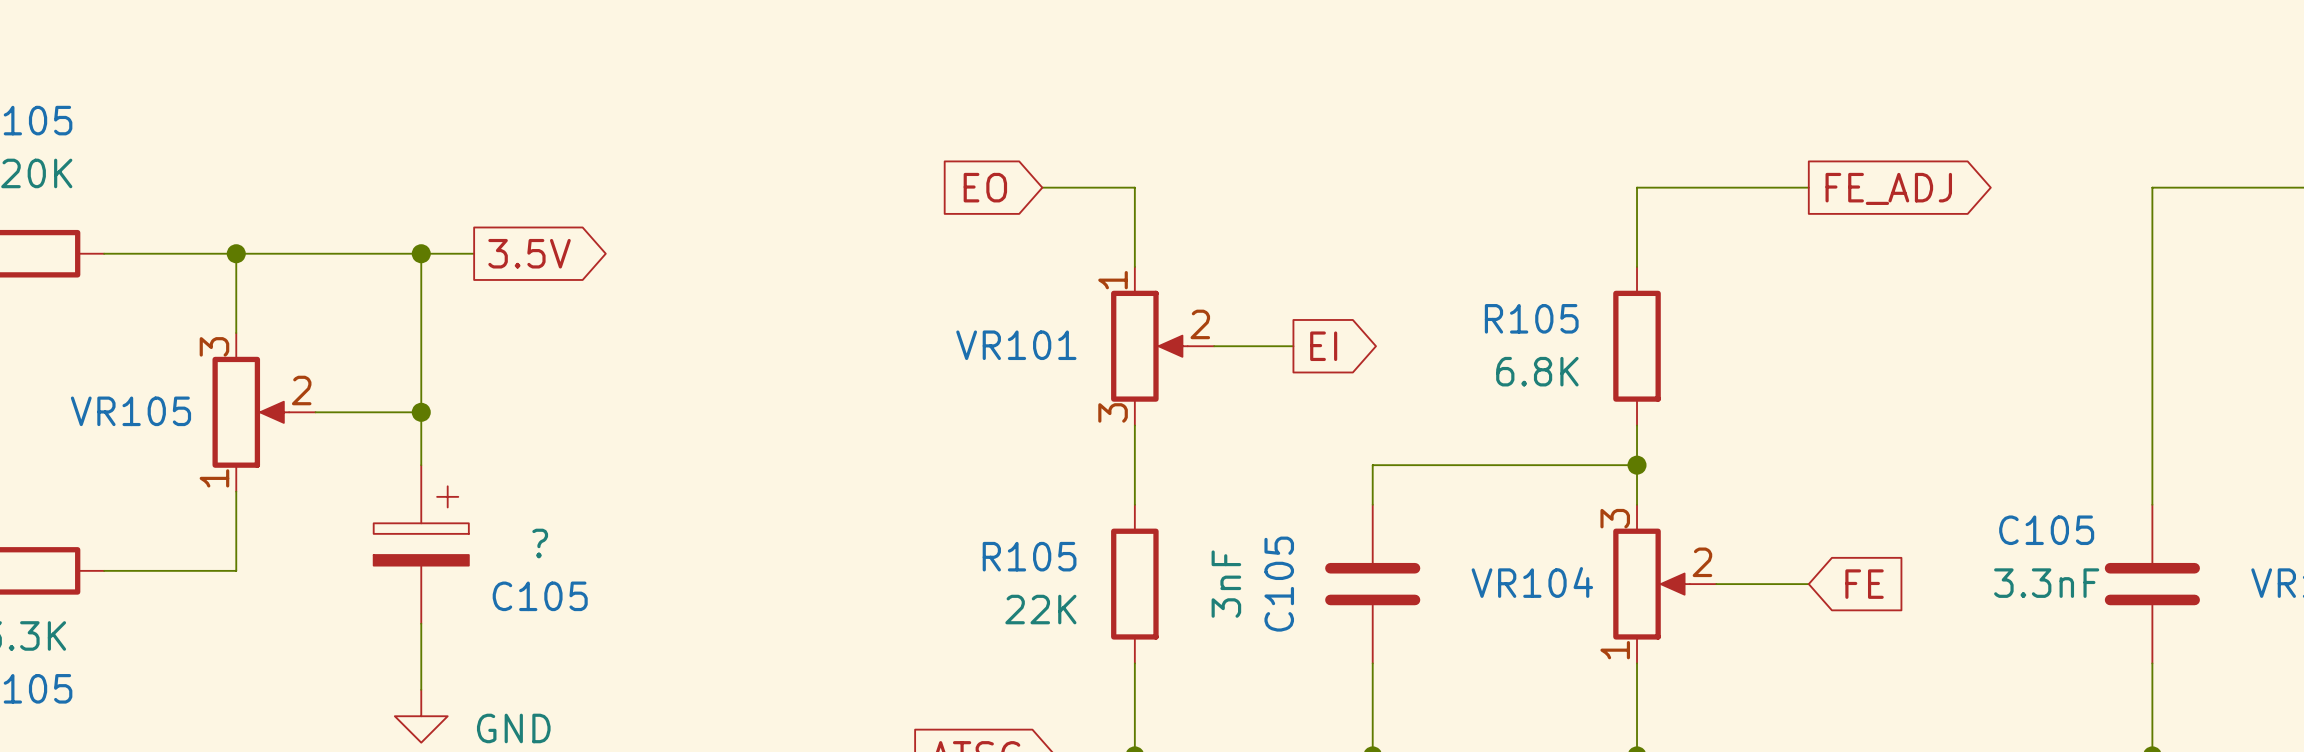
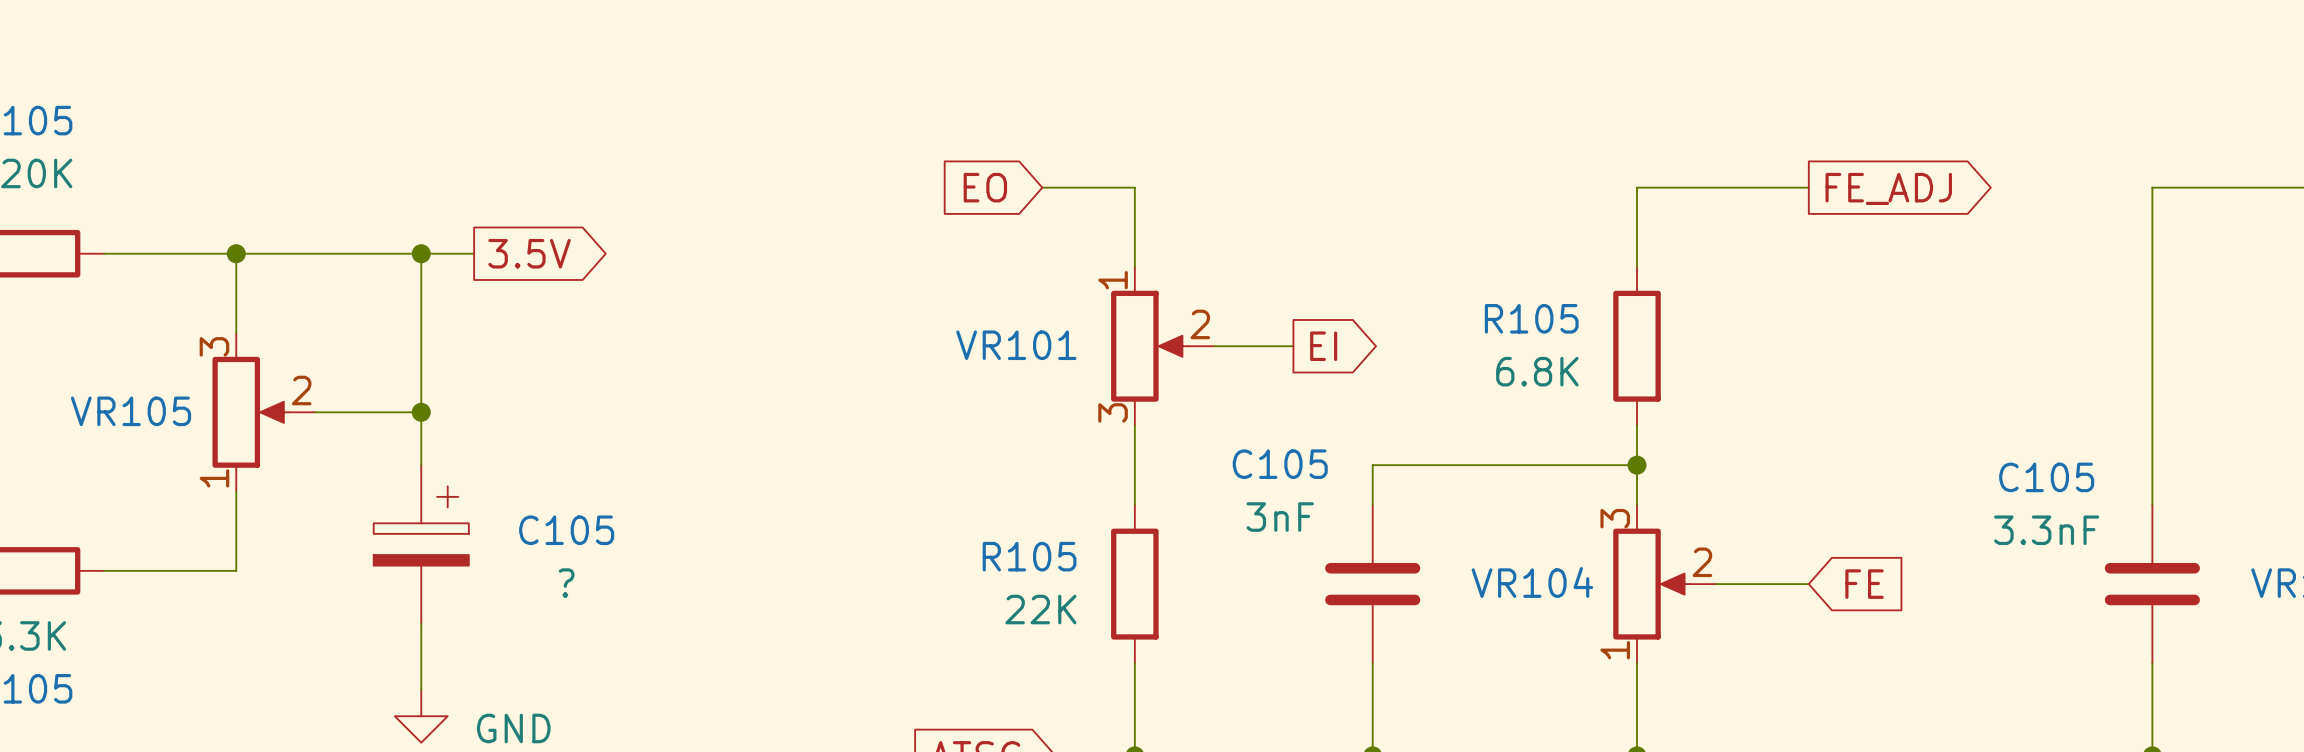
C105 name position: C105 (2046, 530) -> C105 (2046, 477)
C105 value position: ? (540, 543) -> ? (566, 583)
C105 value position: 3.3nF (2046, 583) -> 3.3nF (2046, 530)
C105 value rotation: 0° (1226, 584) -> 90° clockwise (1280, 517)
C105 name rotation: 0° (1279, 584) -> 90° clockwise (1280, 464)
C105 name position: C105 (540, 596) -> C105 (566, 530)

